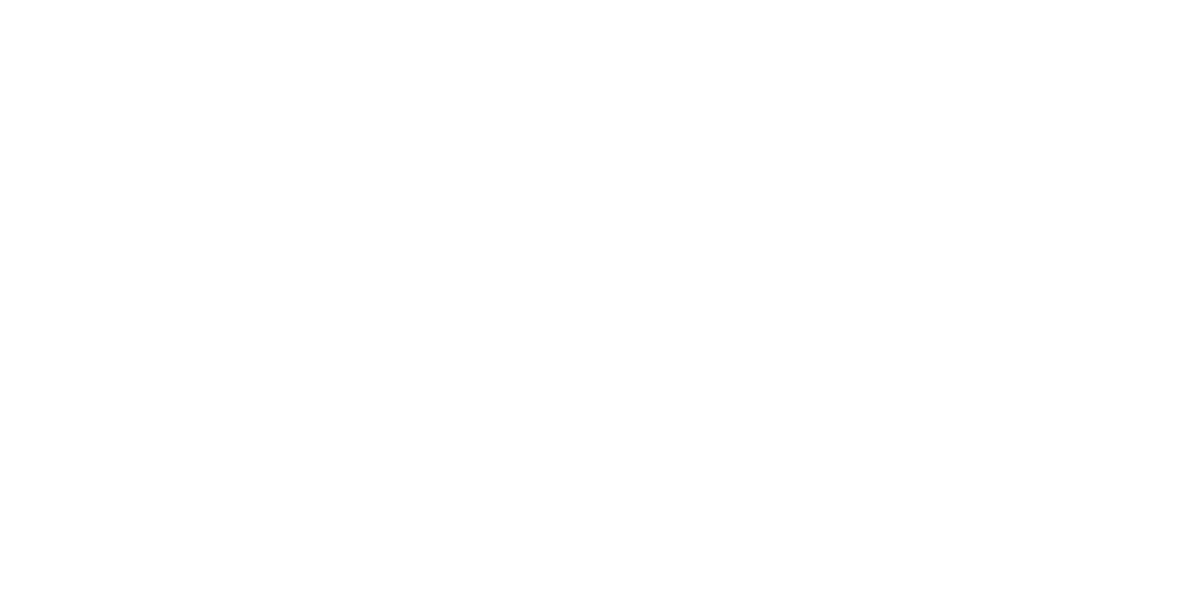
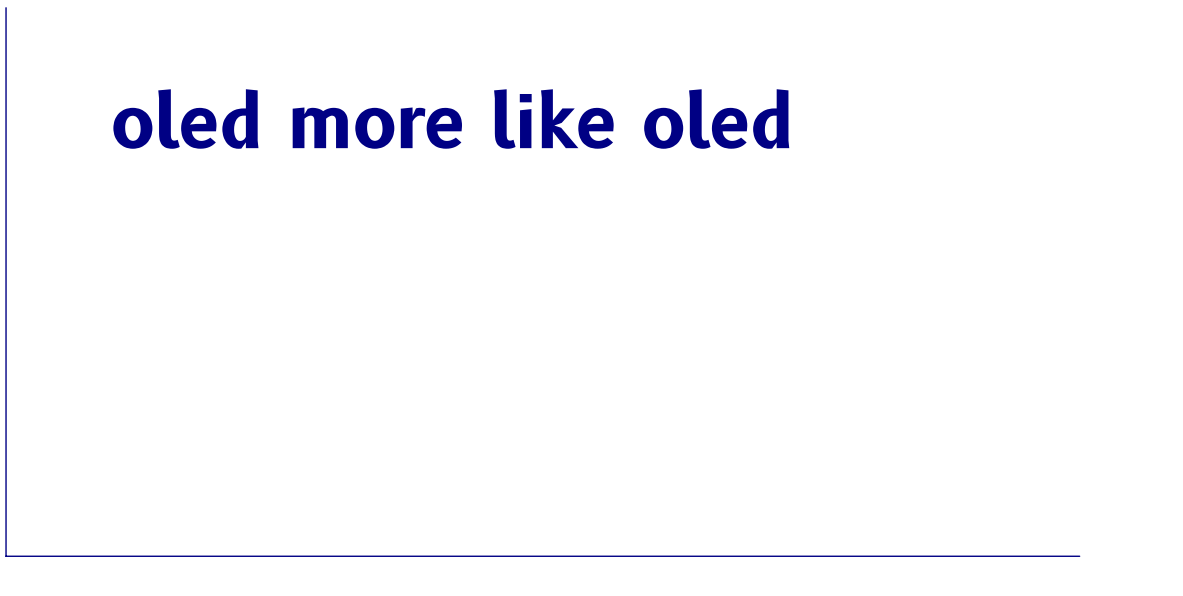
line: none -> (6, 7) (6, 556) (1079, 556)
text: none -> oled more like oled (451, 118)

